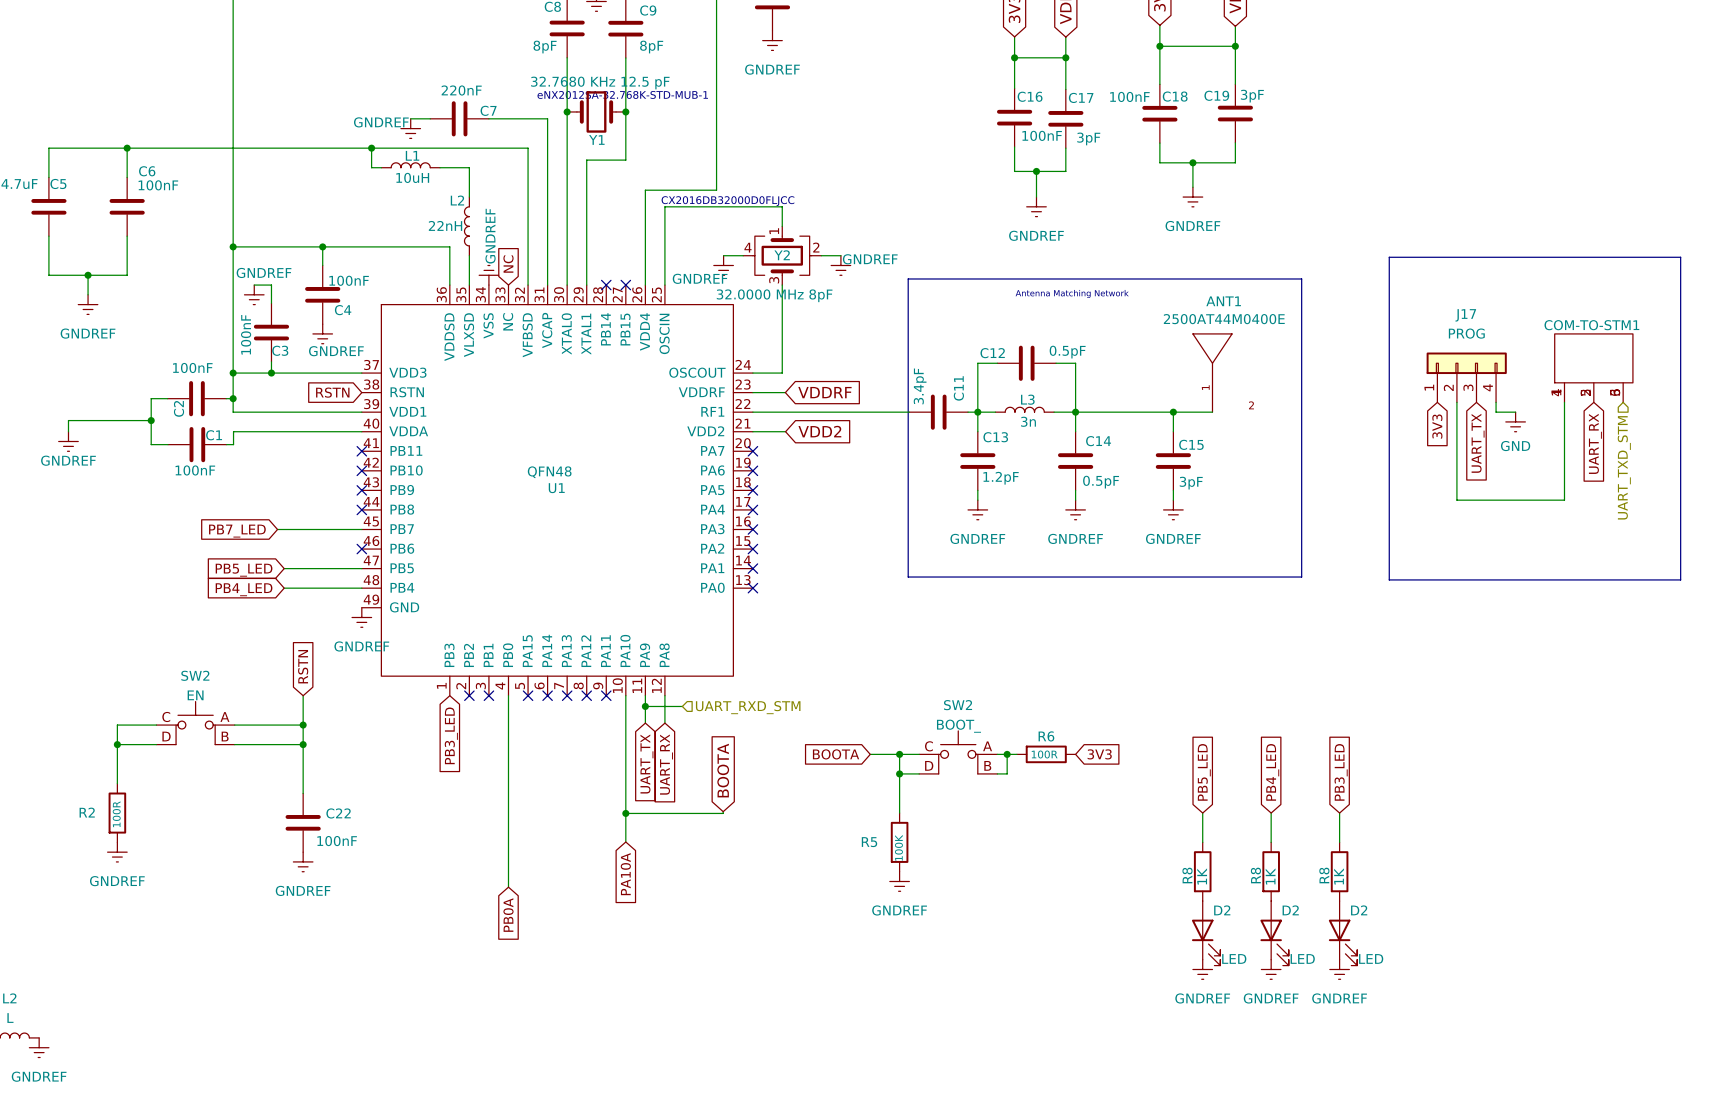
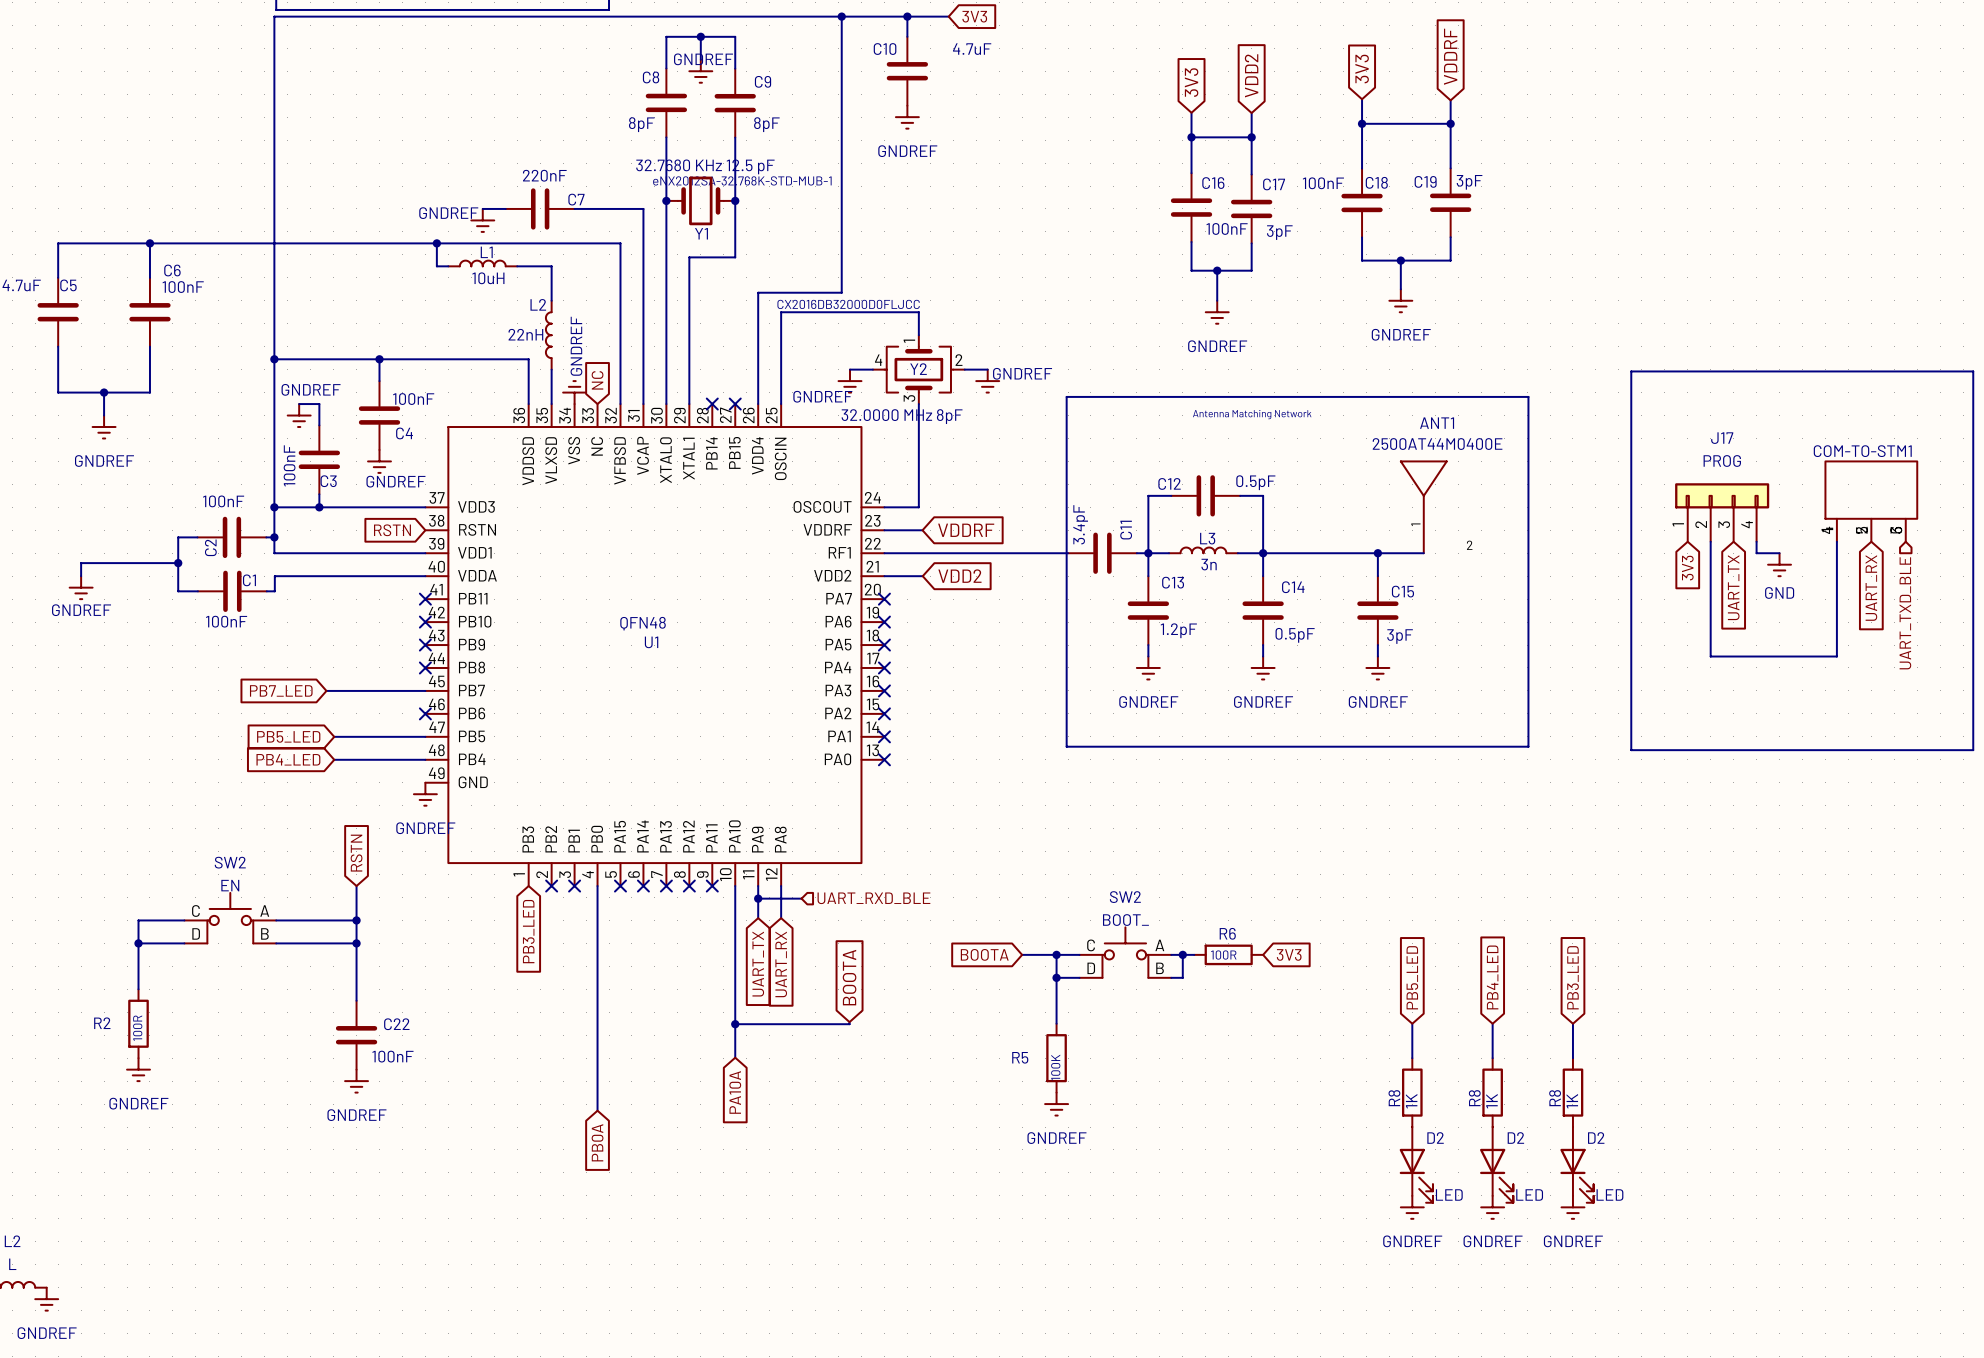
hierarchical label: UART_TXD_STM (1624, 467) -> UART_TXD_BLE (1905, 613)
hierarchical label: UART_RXD_STM (748, 707) -> UART_RXD_BLE (873, 898)

